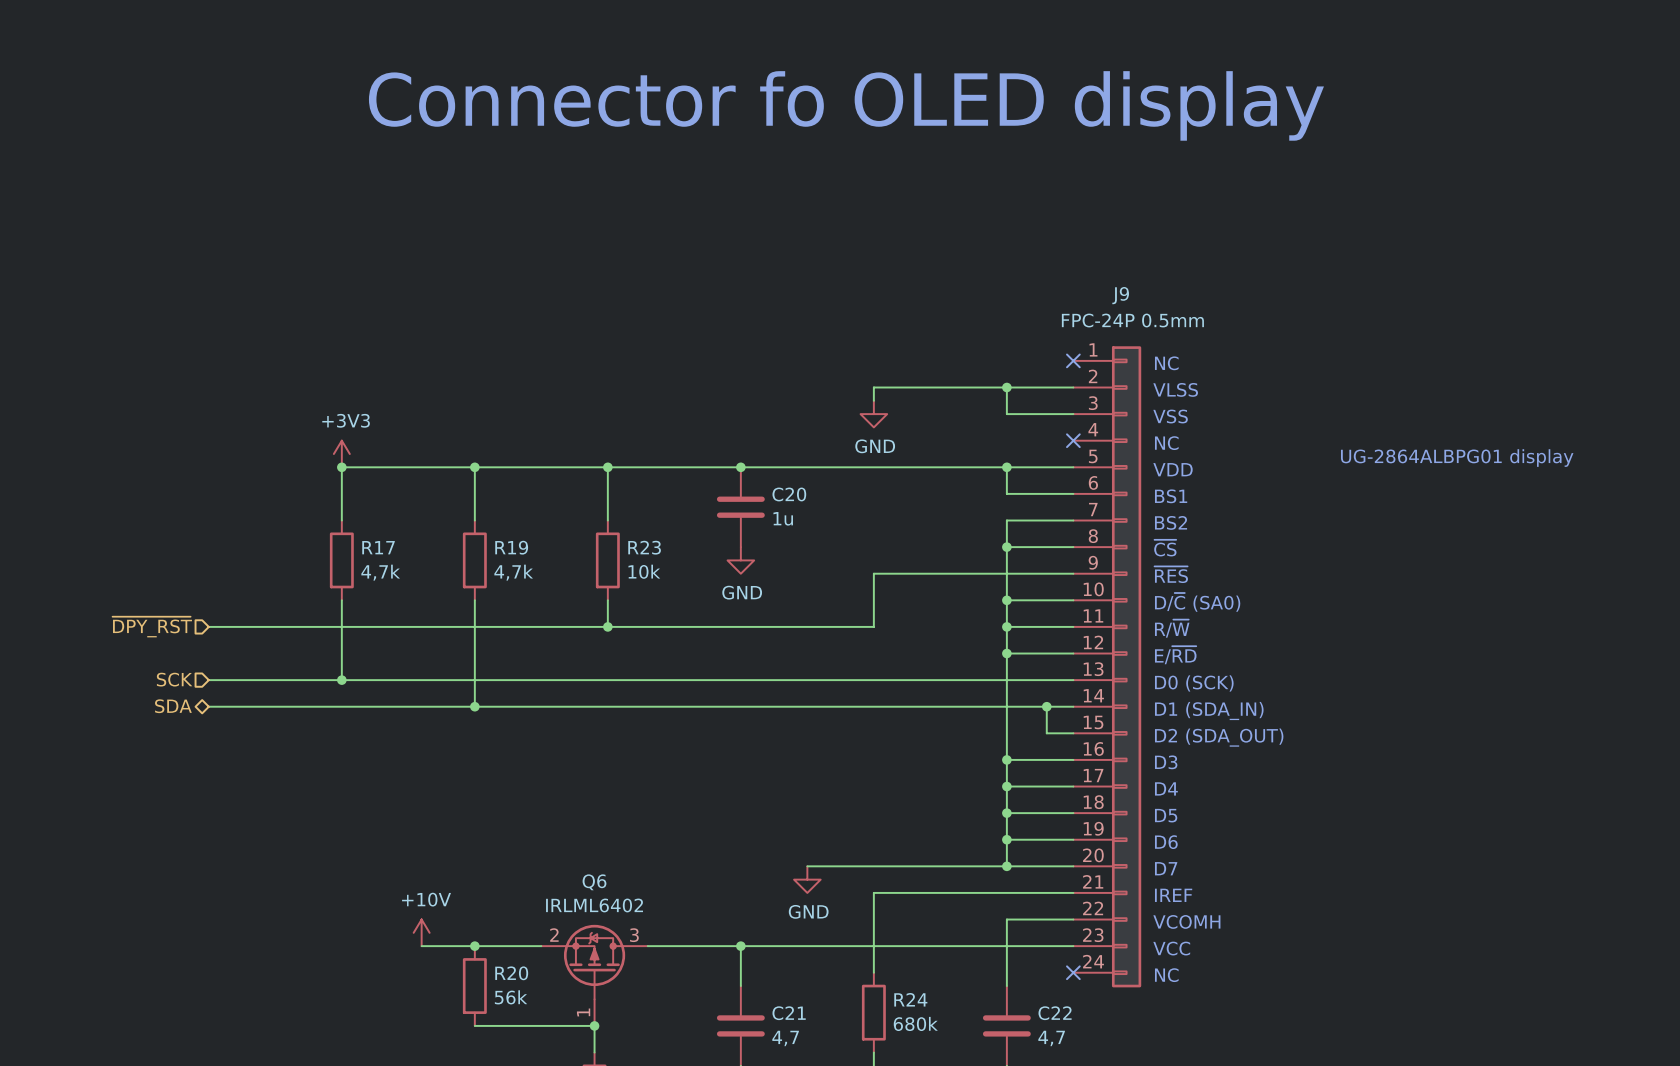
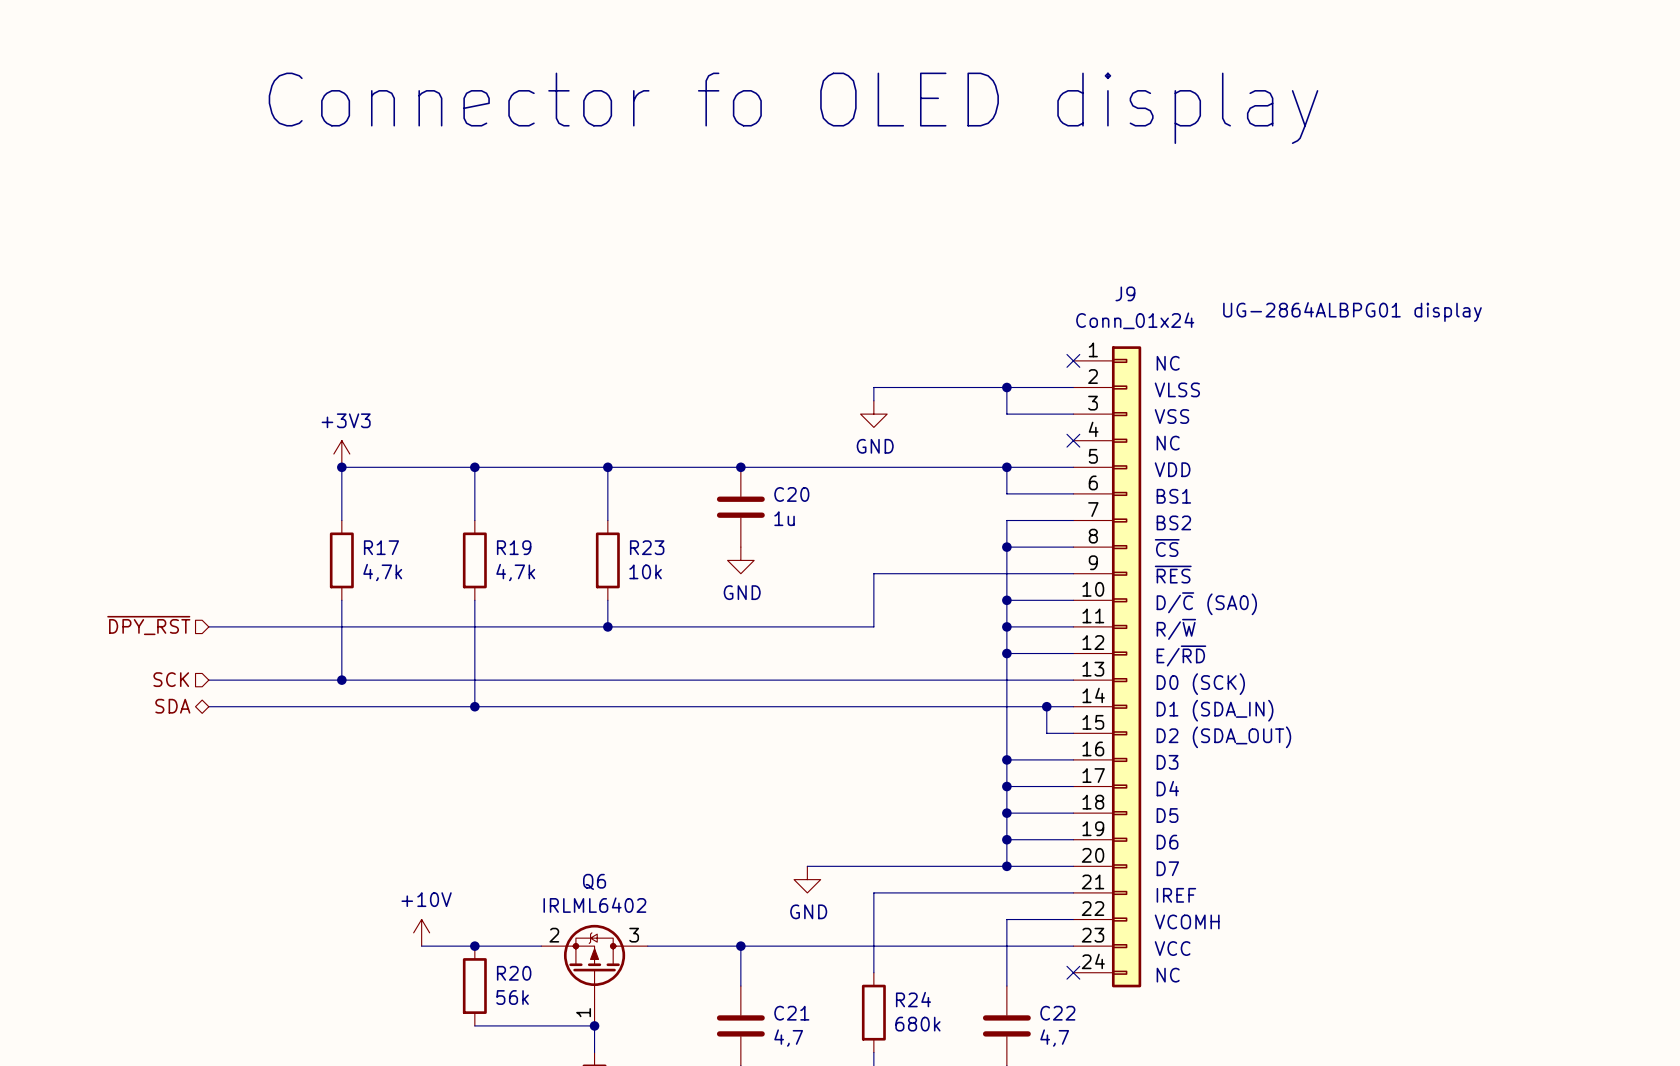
J9 value: FPC-24P 0.5mm (1132, 320) -> Conn_01x24 (1135, 320)
text position: UG-2864ALBPG01 display (1457, 458) -> UG-2864ALBPG01 display (1352, 312)

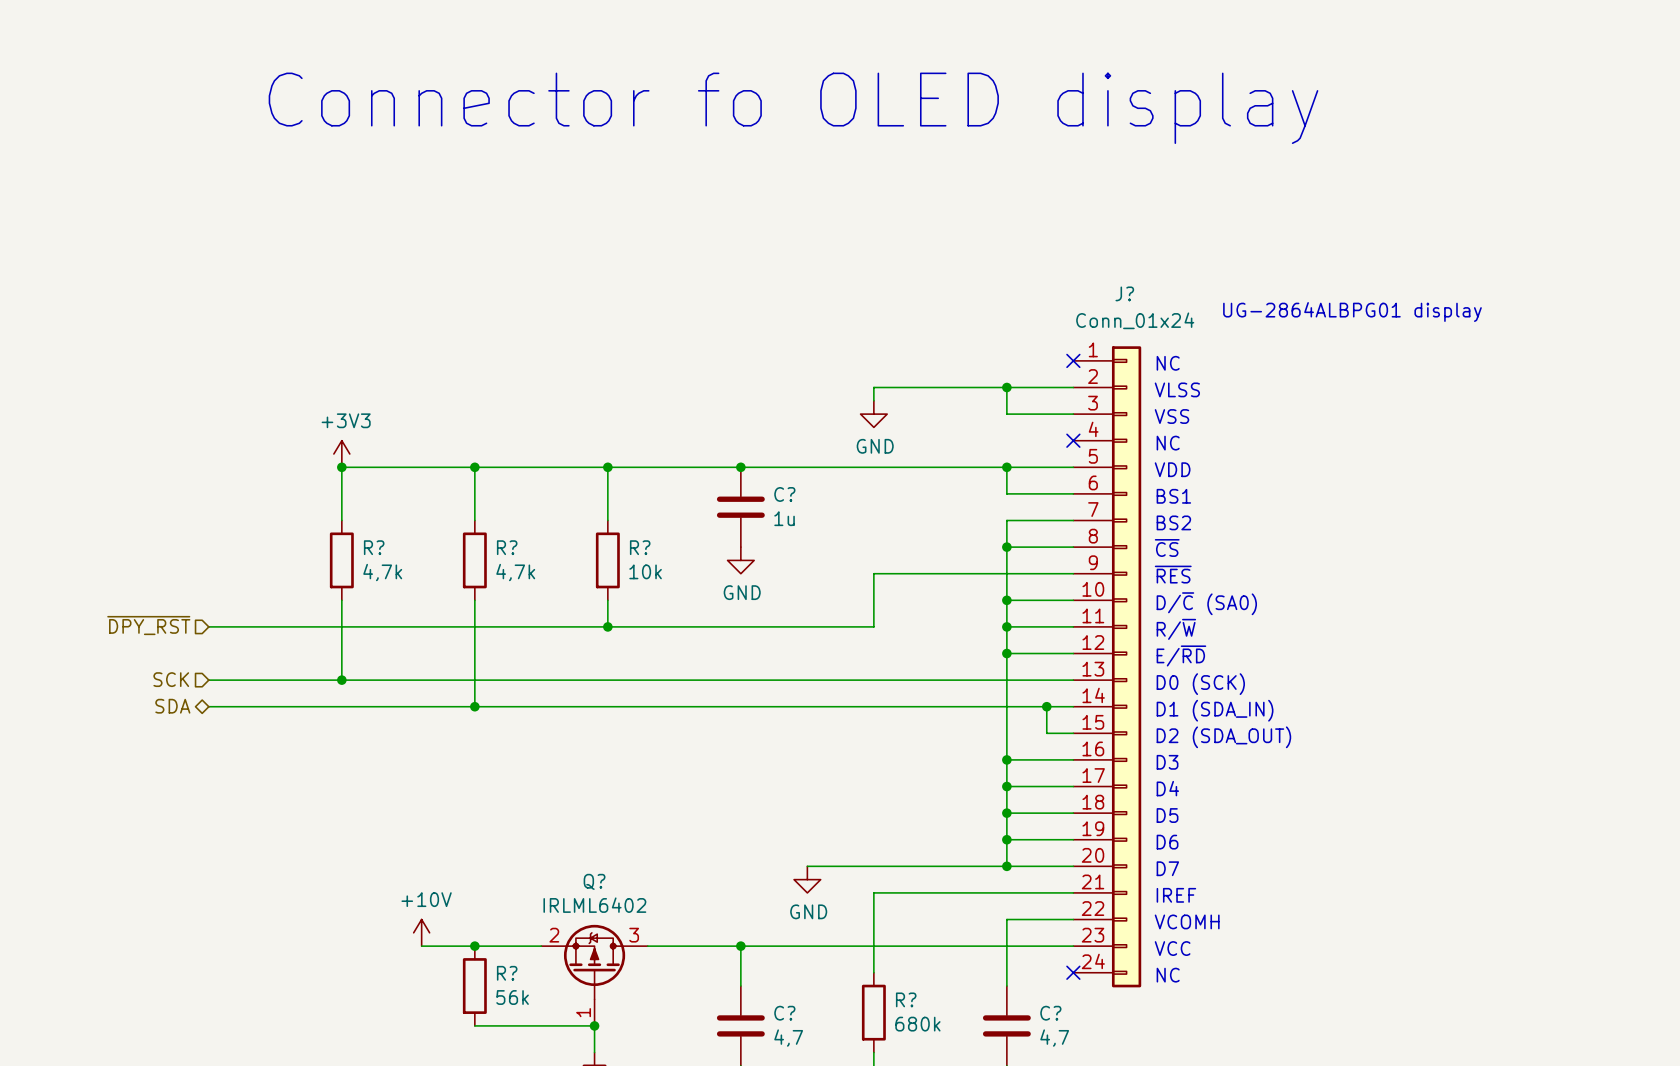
J9 name: J9 (1125, 293) -> J? (1124, 293)
C20 name: C20 (791, 494) -> C? (784, 494)
R17 name: R17 (381, 547) -> R? (374, 547)
R19 name: R19 (514, 547) -> R? (507, 547)
R23 name: R23 (647, 547) -> R? (640, 547)
Q6 name: Q6 (594, 881) -> Q? (594, 881)
R20 name: R20 (514, 973) -> R? (507, 973)
R24 name: R24 (913, 999) -> R? (906, 999)
C21 name: C21 (791, 1013) -> C? (784, 1013)
C22 name: C22 (1057, 1013) -> C? (1050, 1013)

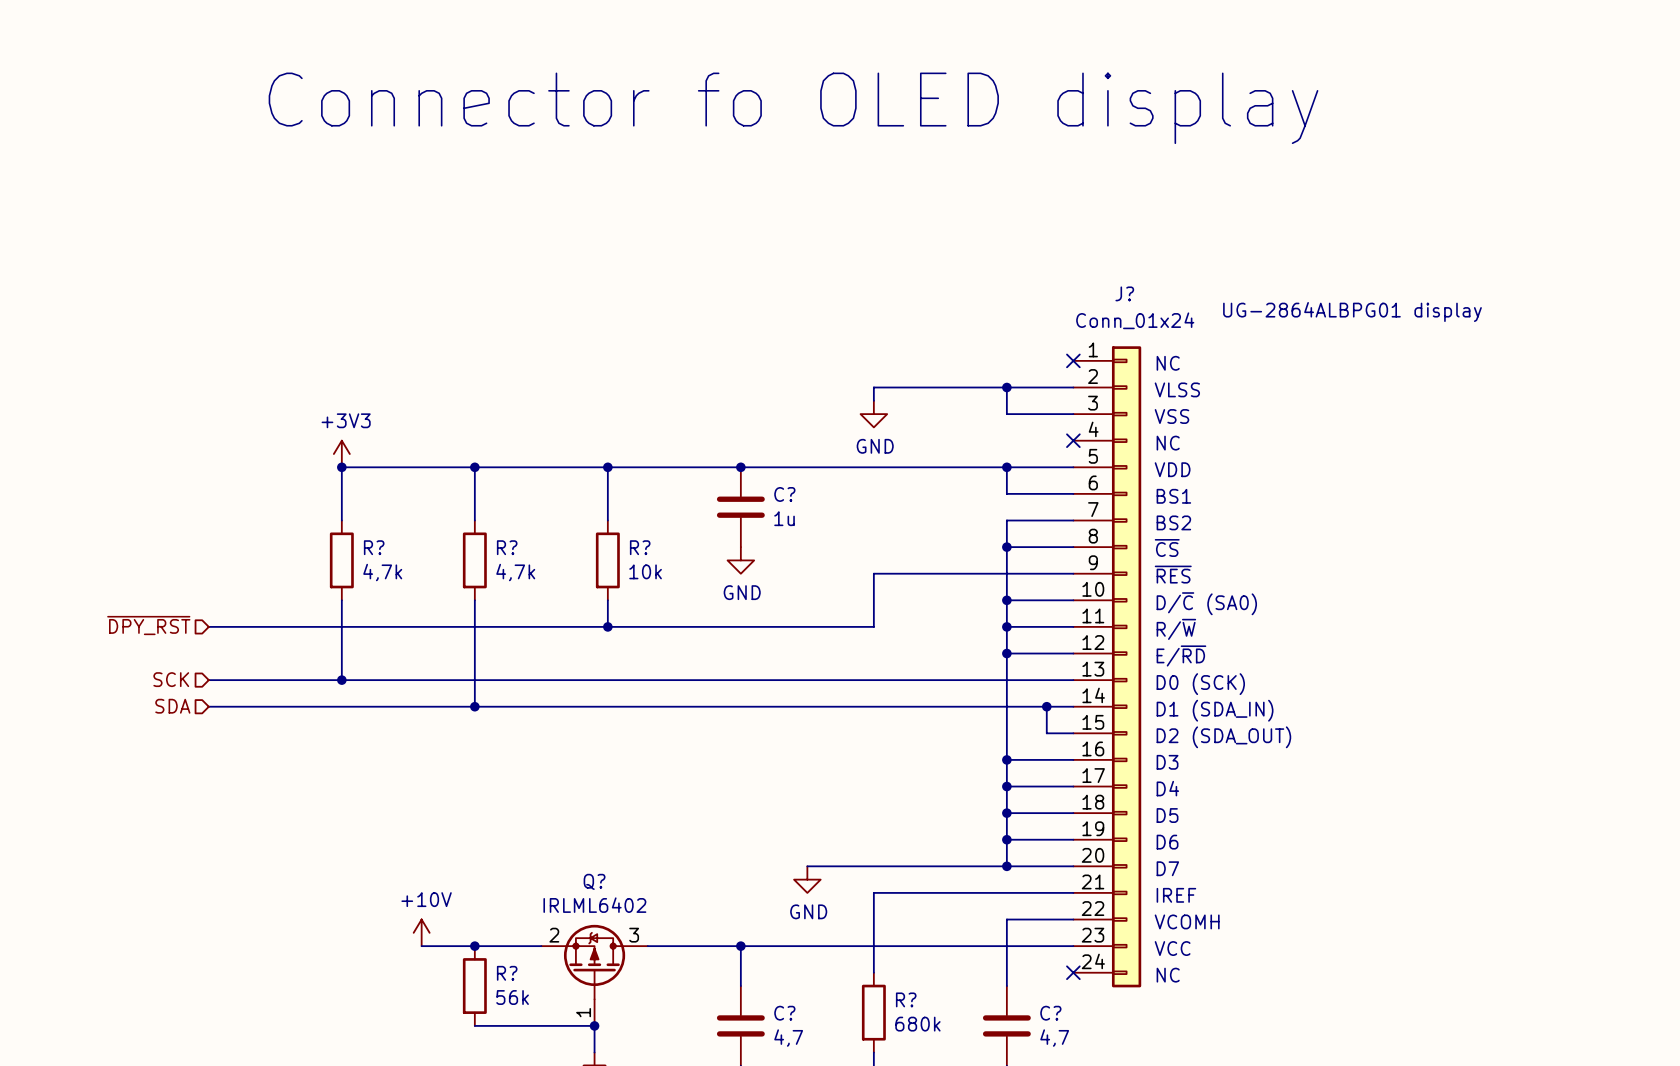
hierarchical label shape: bidirectional (172, 706) -> input (172, 706)

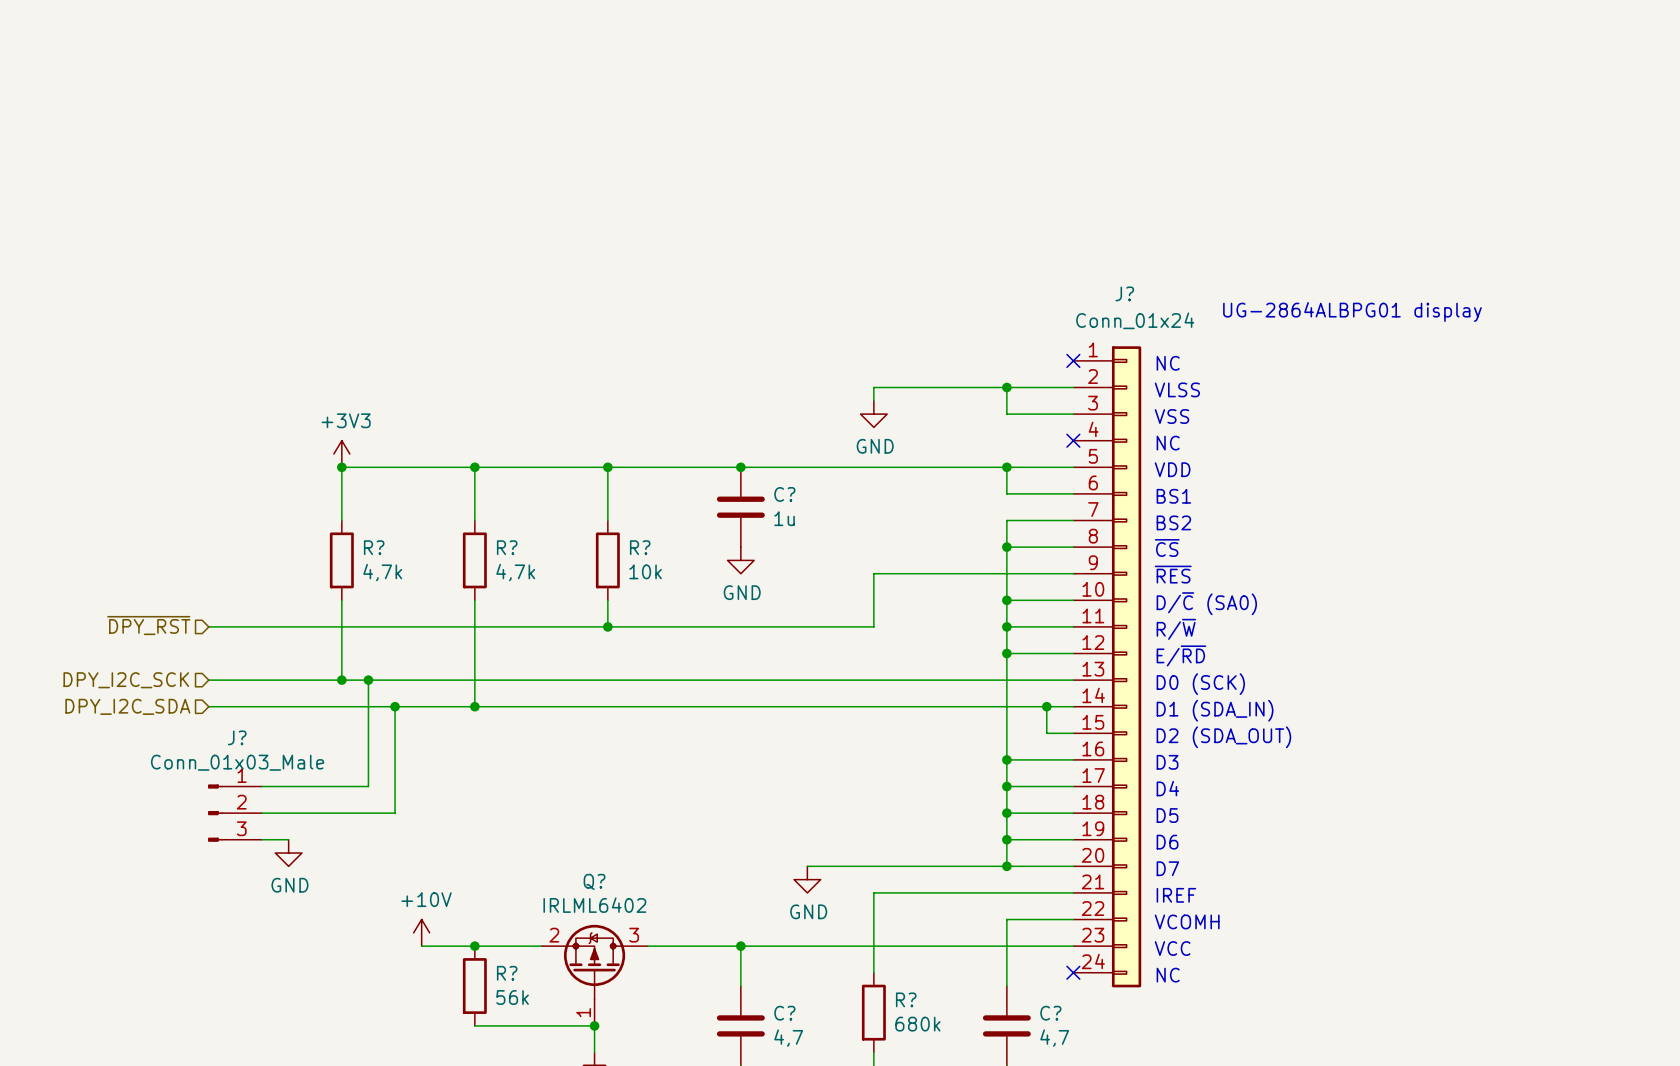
text: Connector fo OLED display (793, 108) -> none
hierarchical label: SCK (171, 679) -> DPY_I2C_SCK (126, 680)
wire: none -> (368, 680) (368, 786) (262, 786)
junction: none -> (368, 680)
hierarchical label: SDA (172, 706) -> DPY_I2C_SDA (127, 706)
wire: none -> (395, 706) (395, 813) (262, 813)
junction: none -> (395, 706)
J?: none -> Conn_01x03_Male (235, 813)
wire: none -> (262, 839) (288, 839)
power symbol: none -> GND (288, 853)

